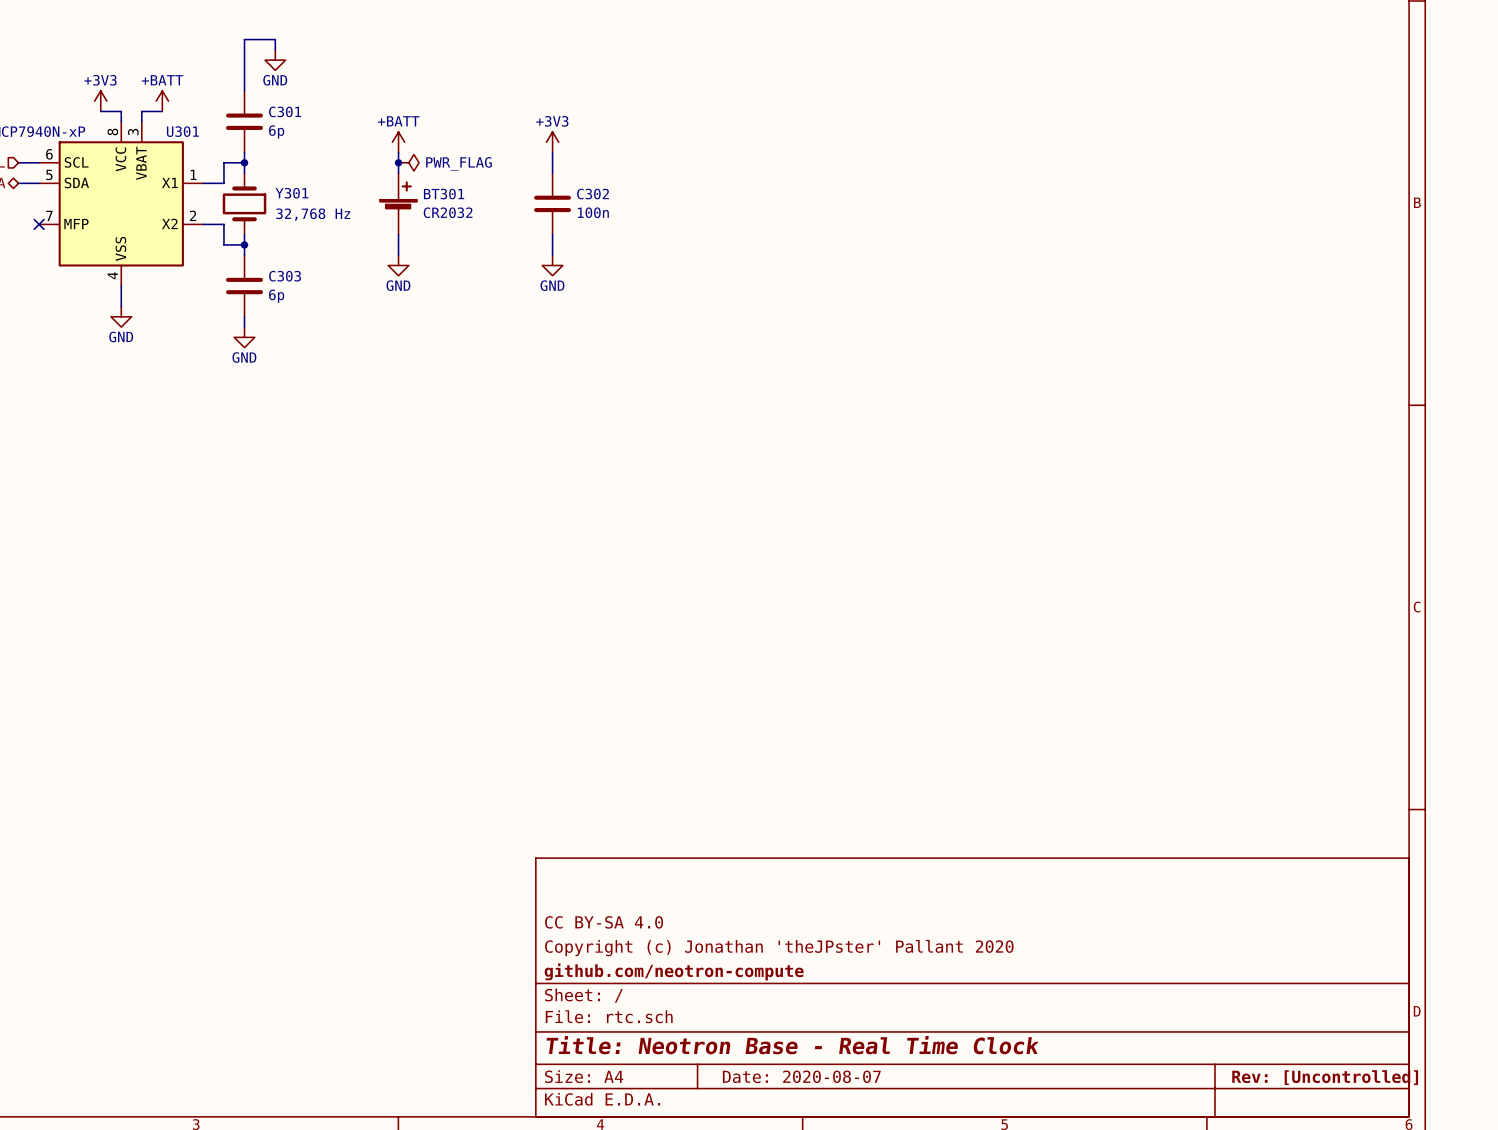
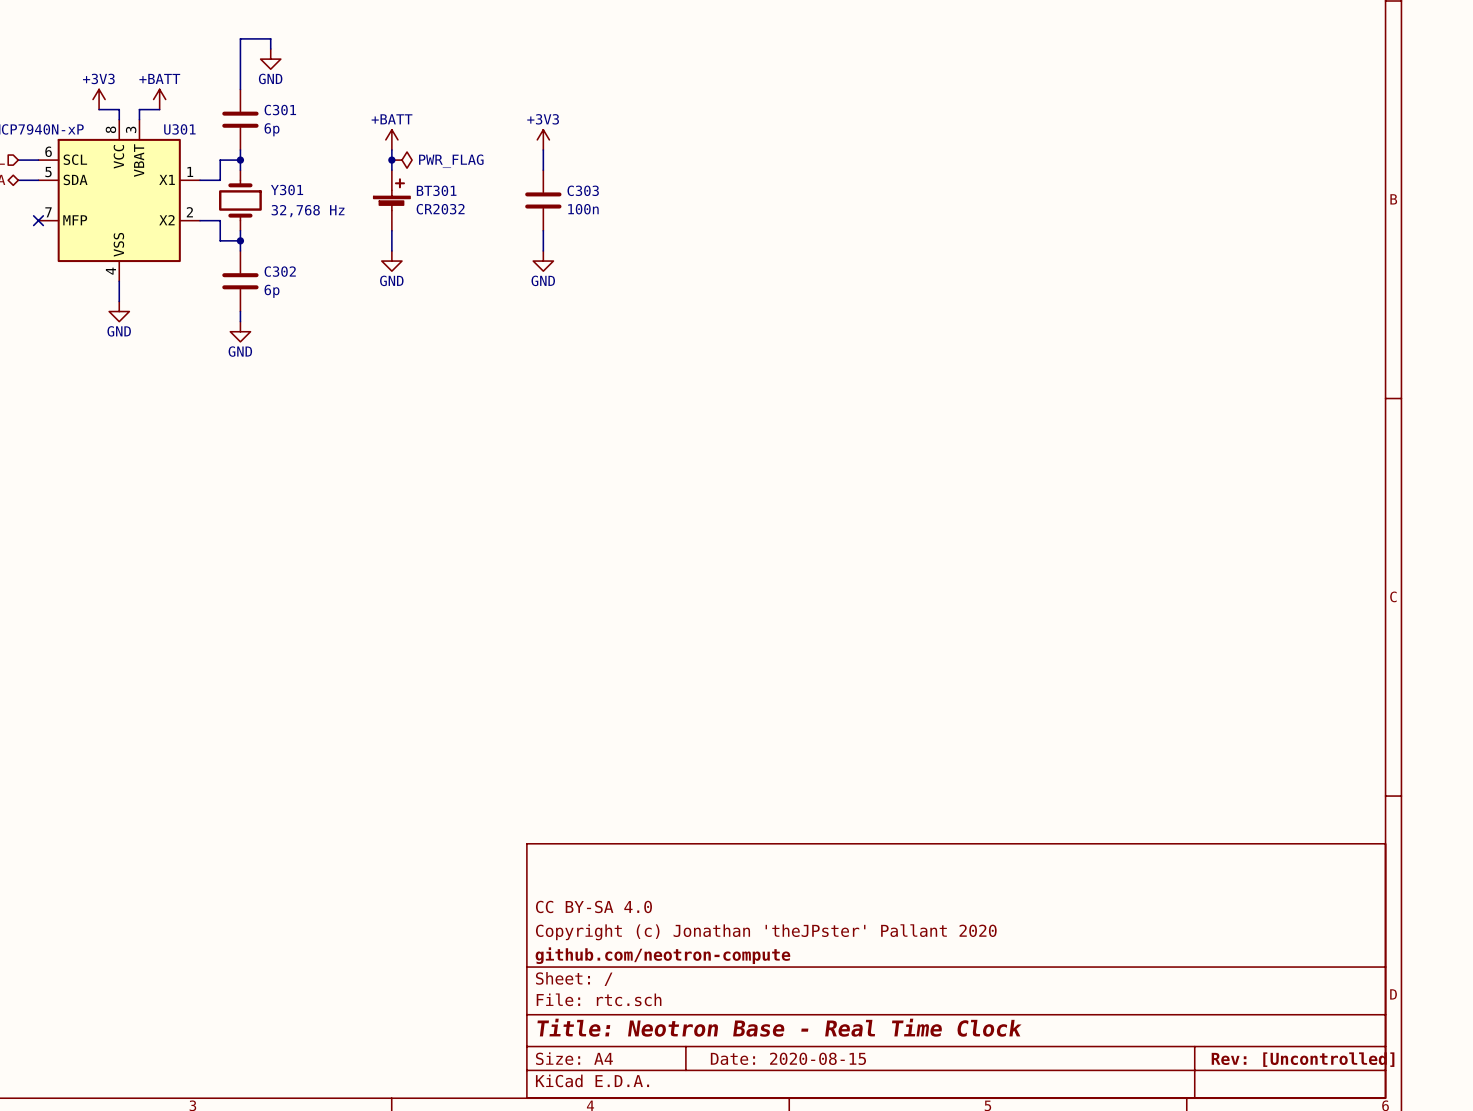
C302 name: C302 (593, 194) -> C303 (583, 190)
C303 name: C303 (285, 276) -> C302 (280, 271)
title block: Date: 2020-08-07 (801, 1076) -> Date: 2020-08-15 (788, 1058)

